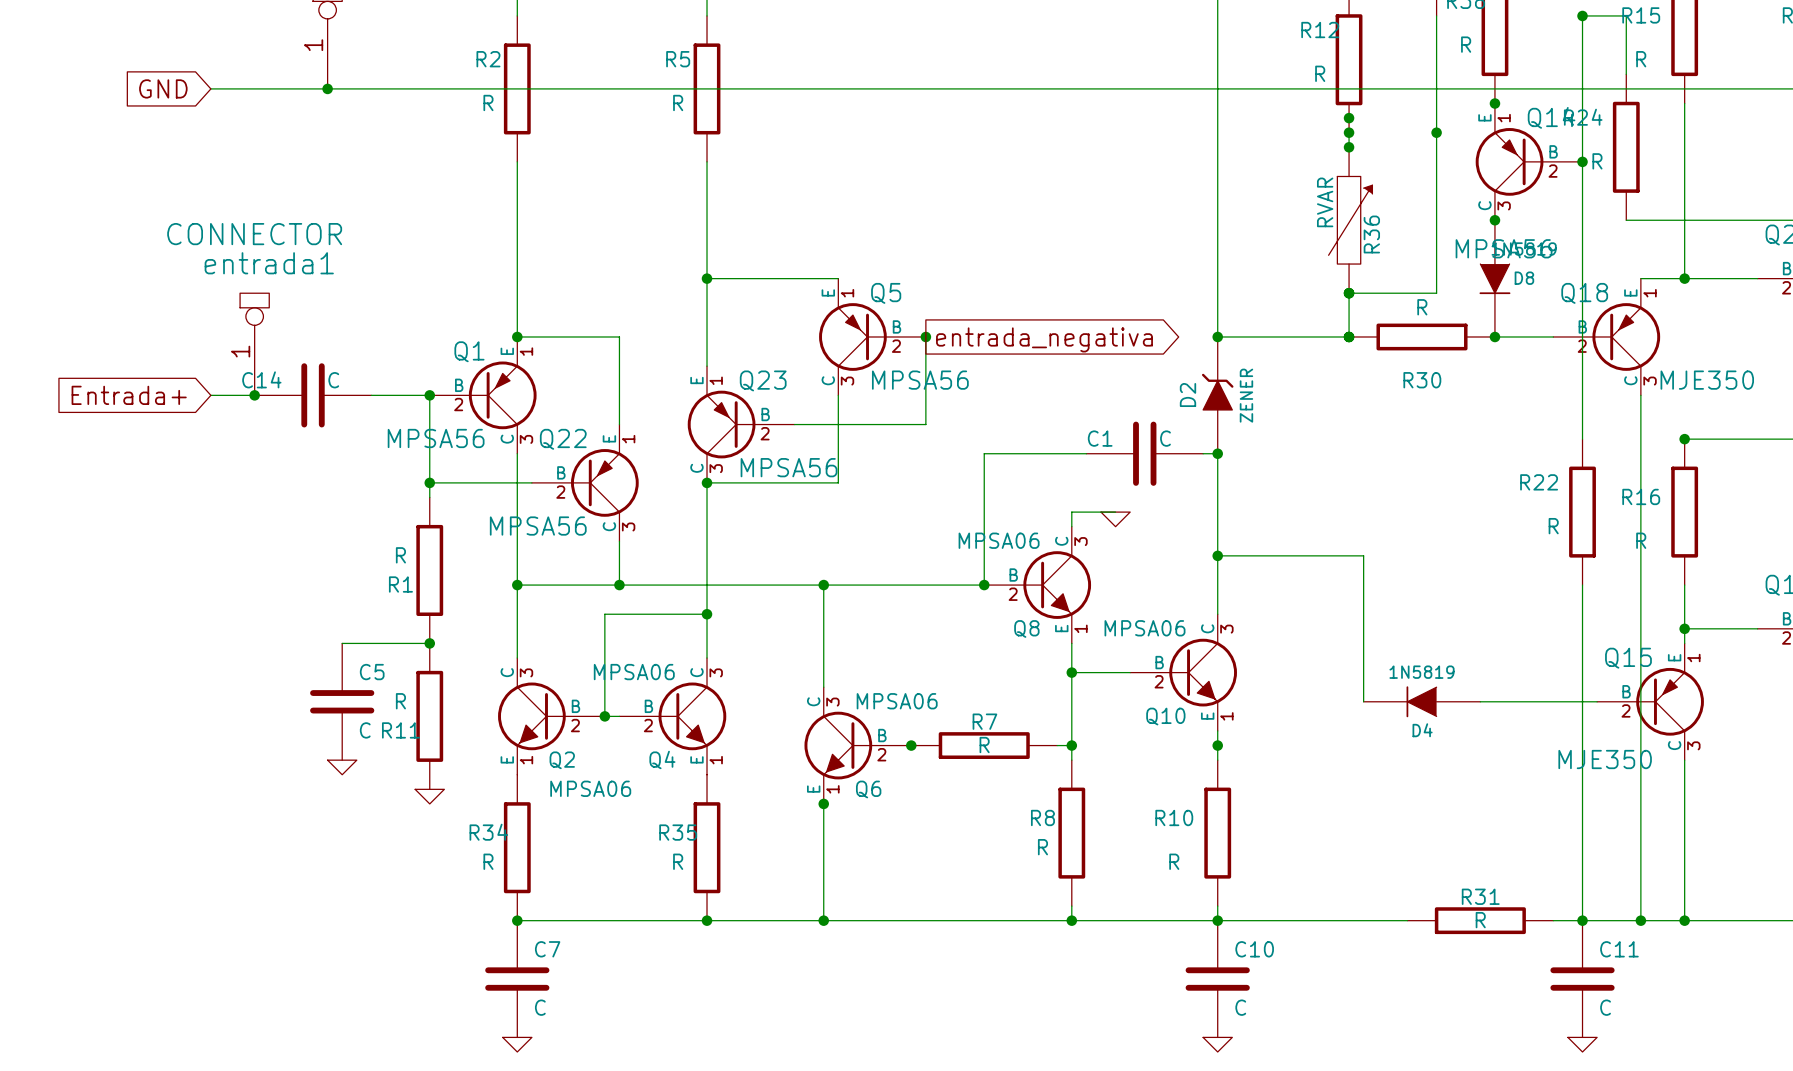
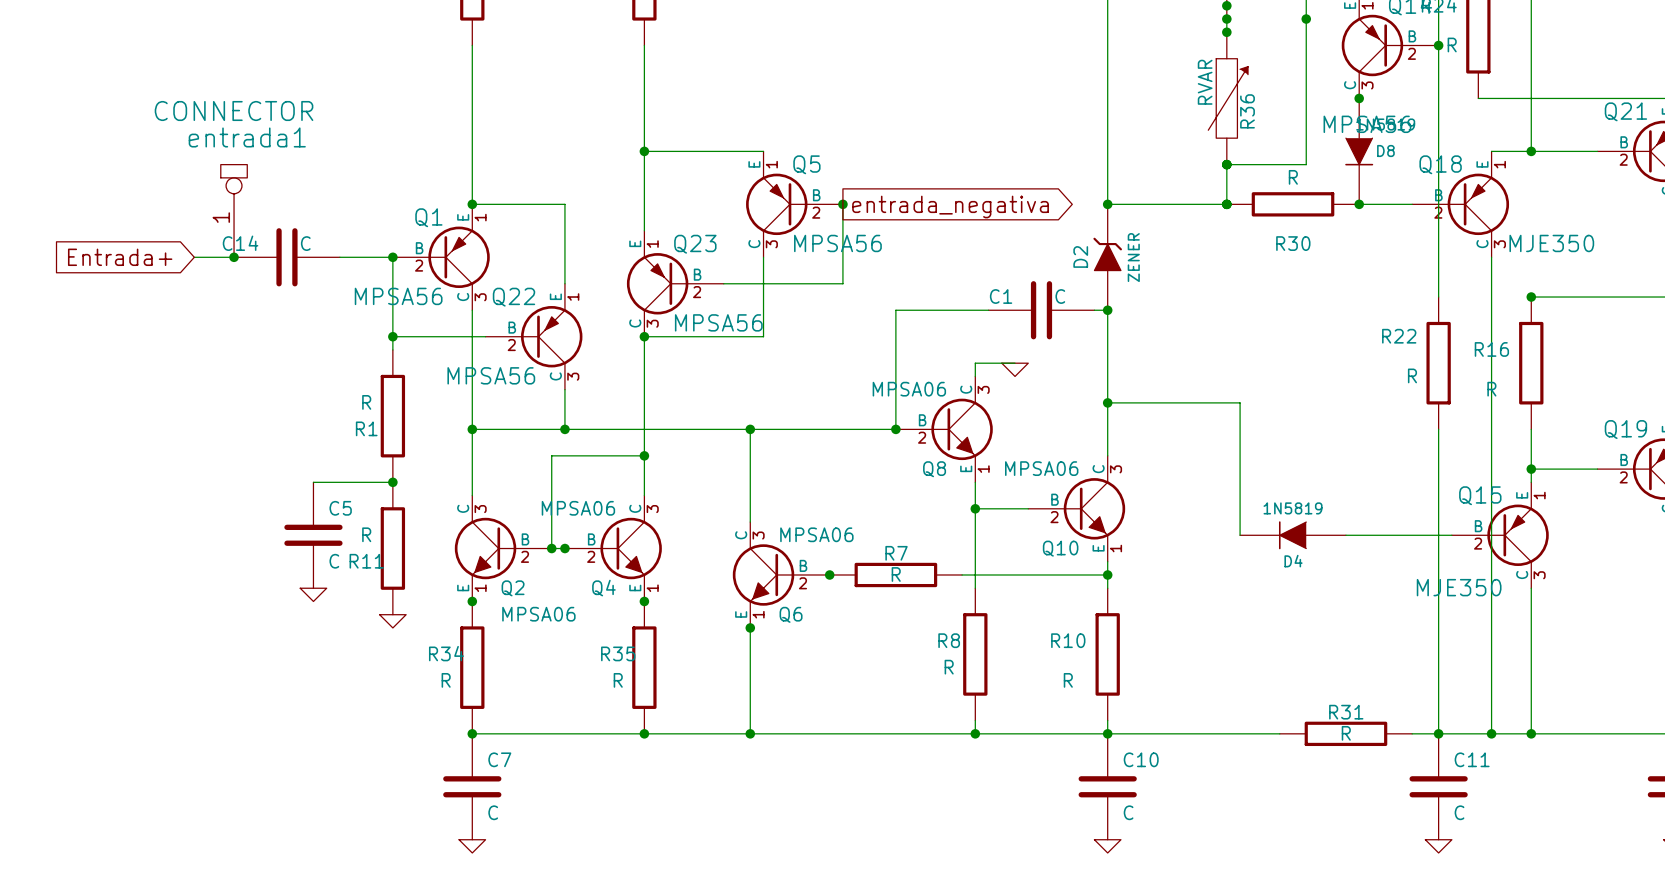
junction: none -> (564, 548)
wire: none -> (975, 574) (1107, 574)
junction: (1071, 745) -> none
junction: none -> (472, 601)
junction: none -> (644, 601)

